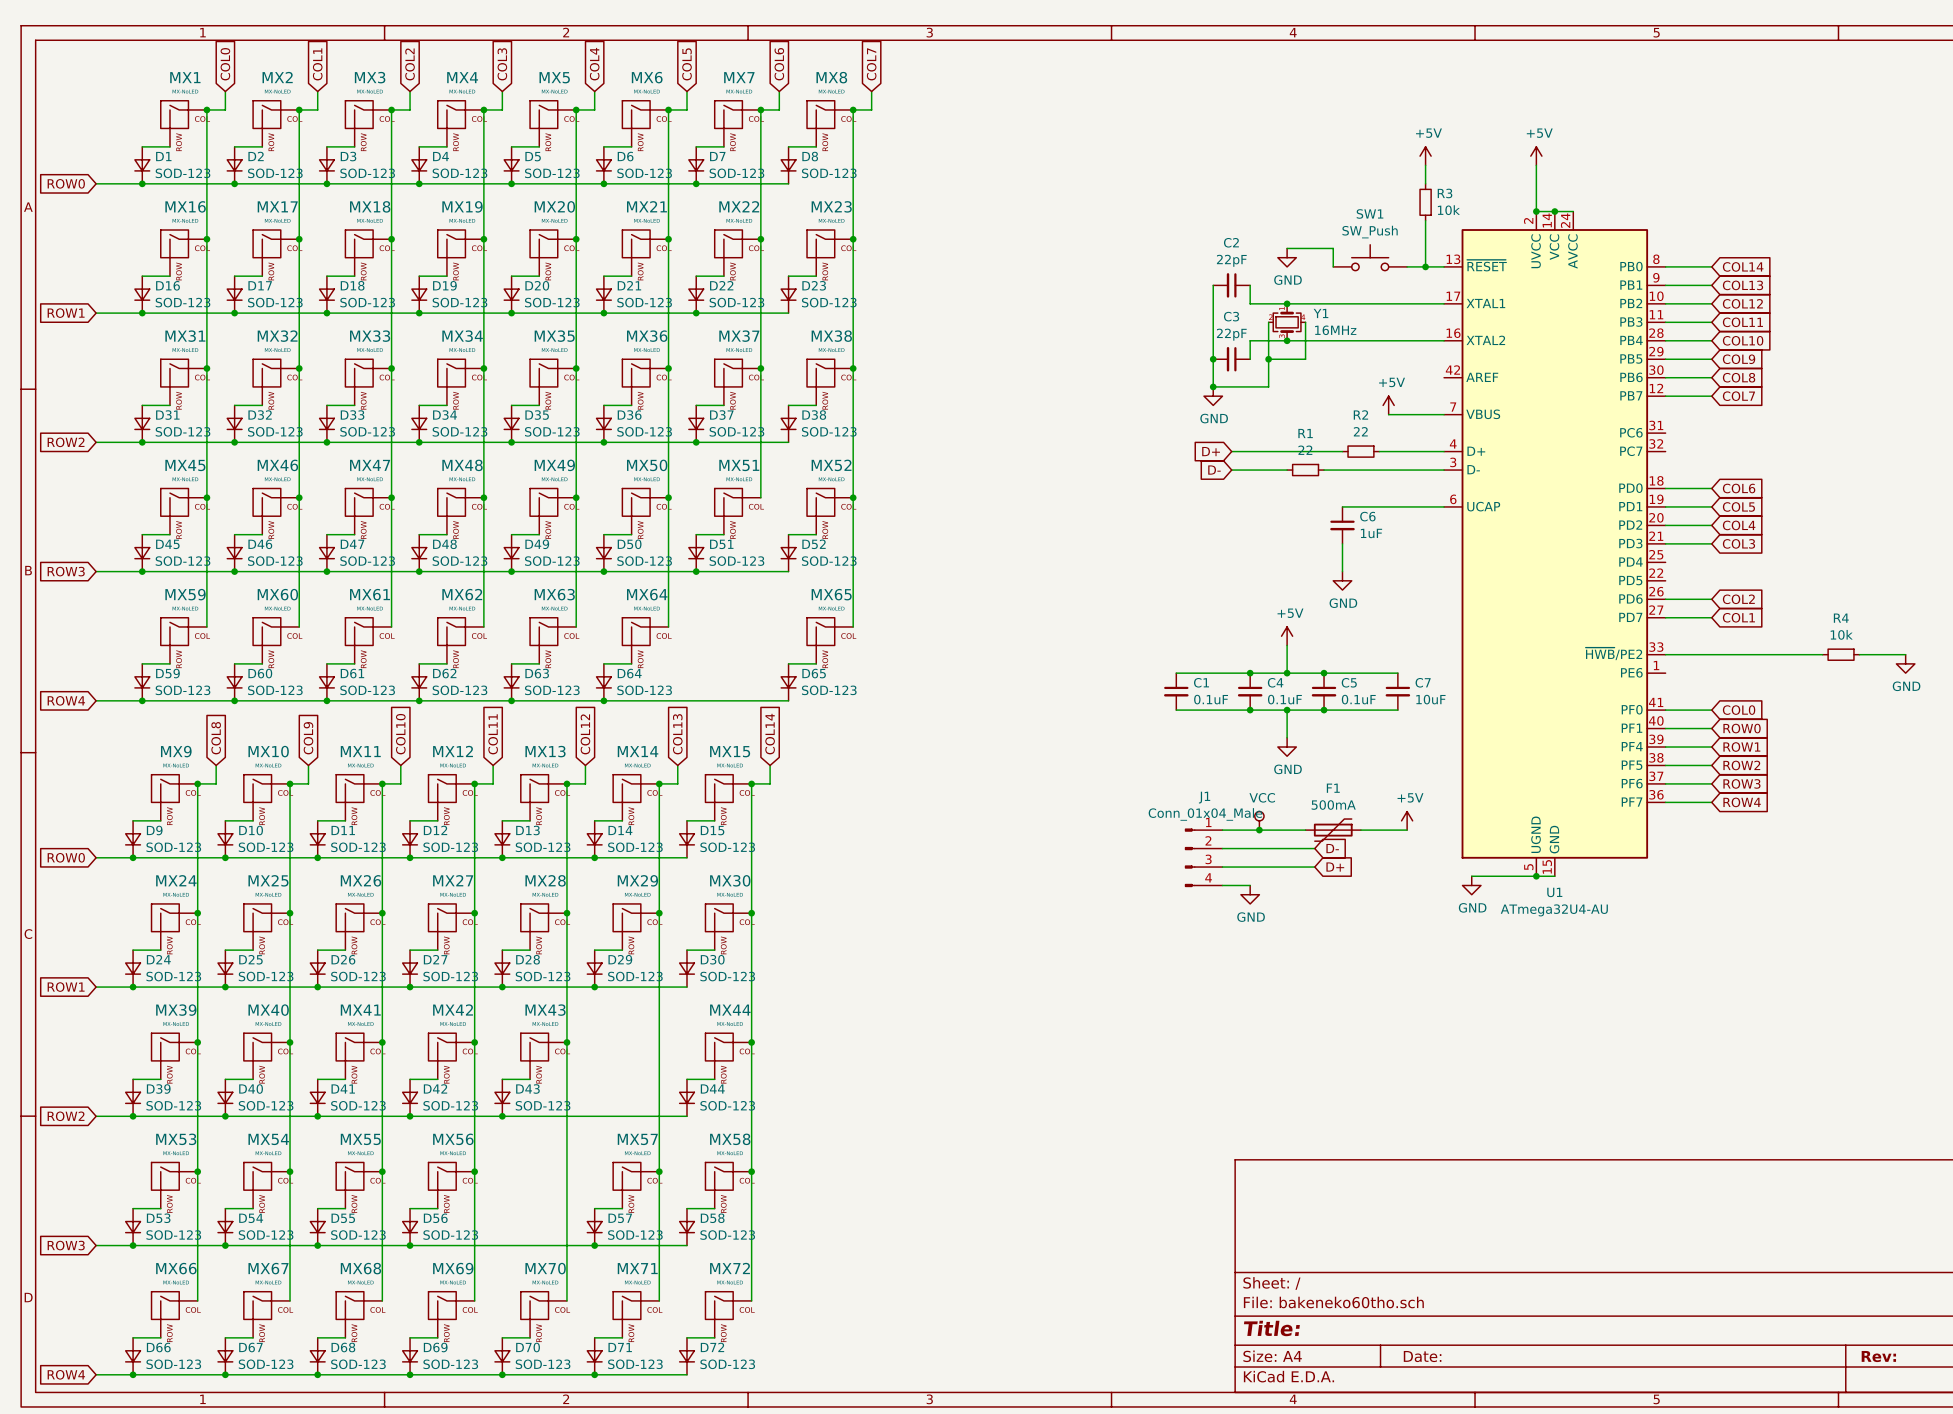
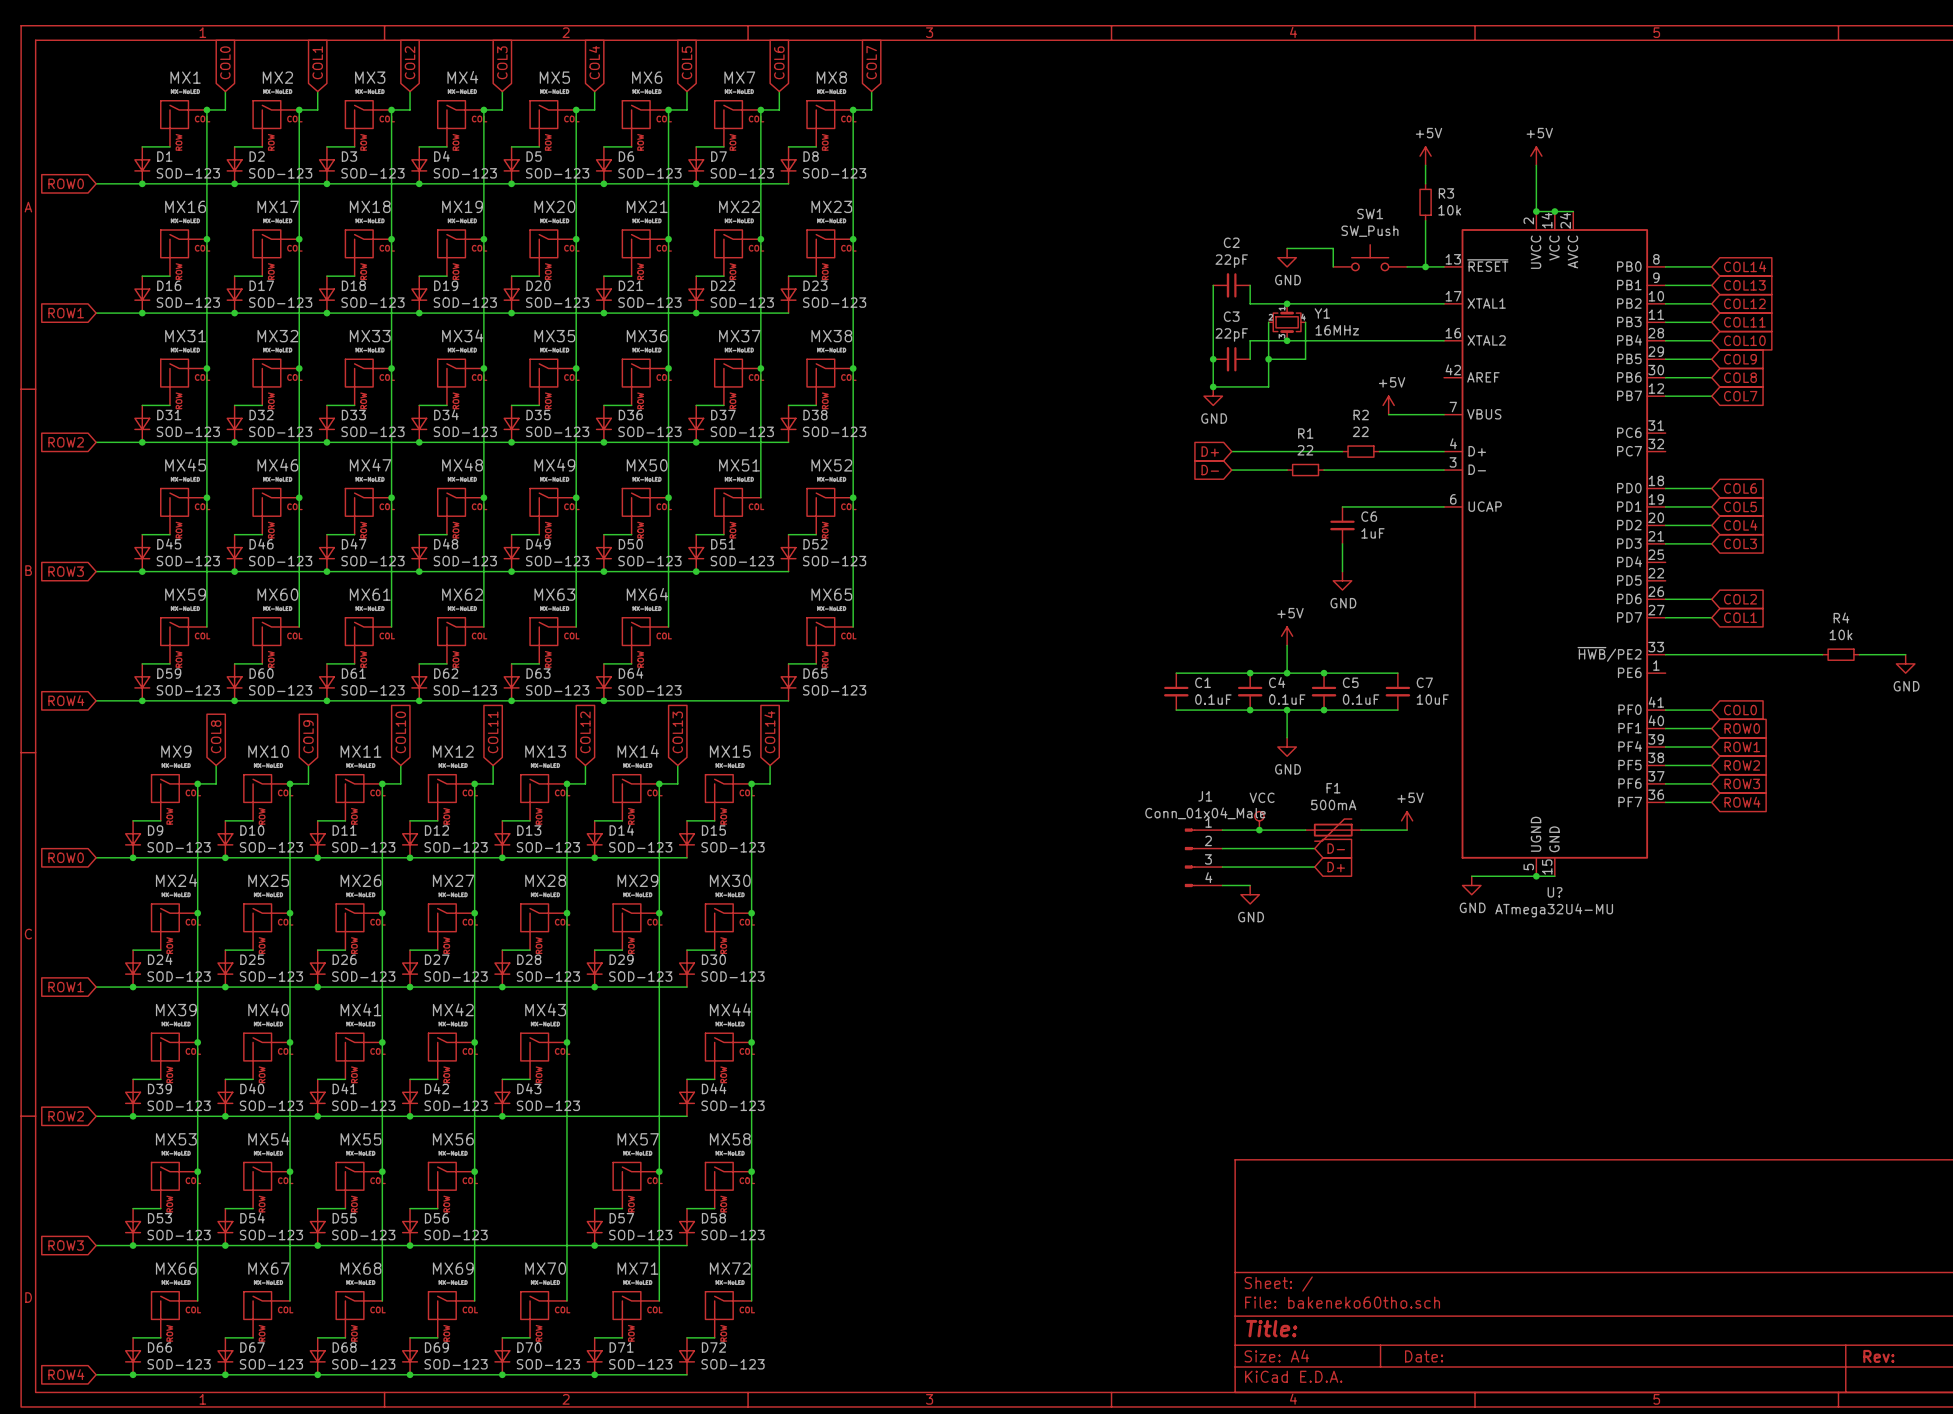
U1 name: U1 (1554, 892) -> U? (1555, 892)
U1 value: ATmega32U4-AU (1554, 910) -> ATmega32U4-MU (1554, 910)

